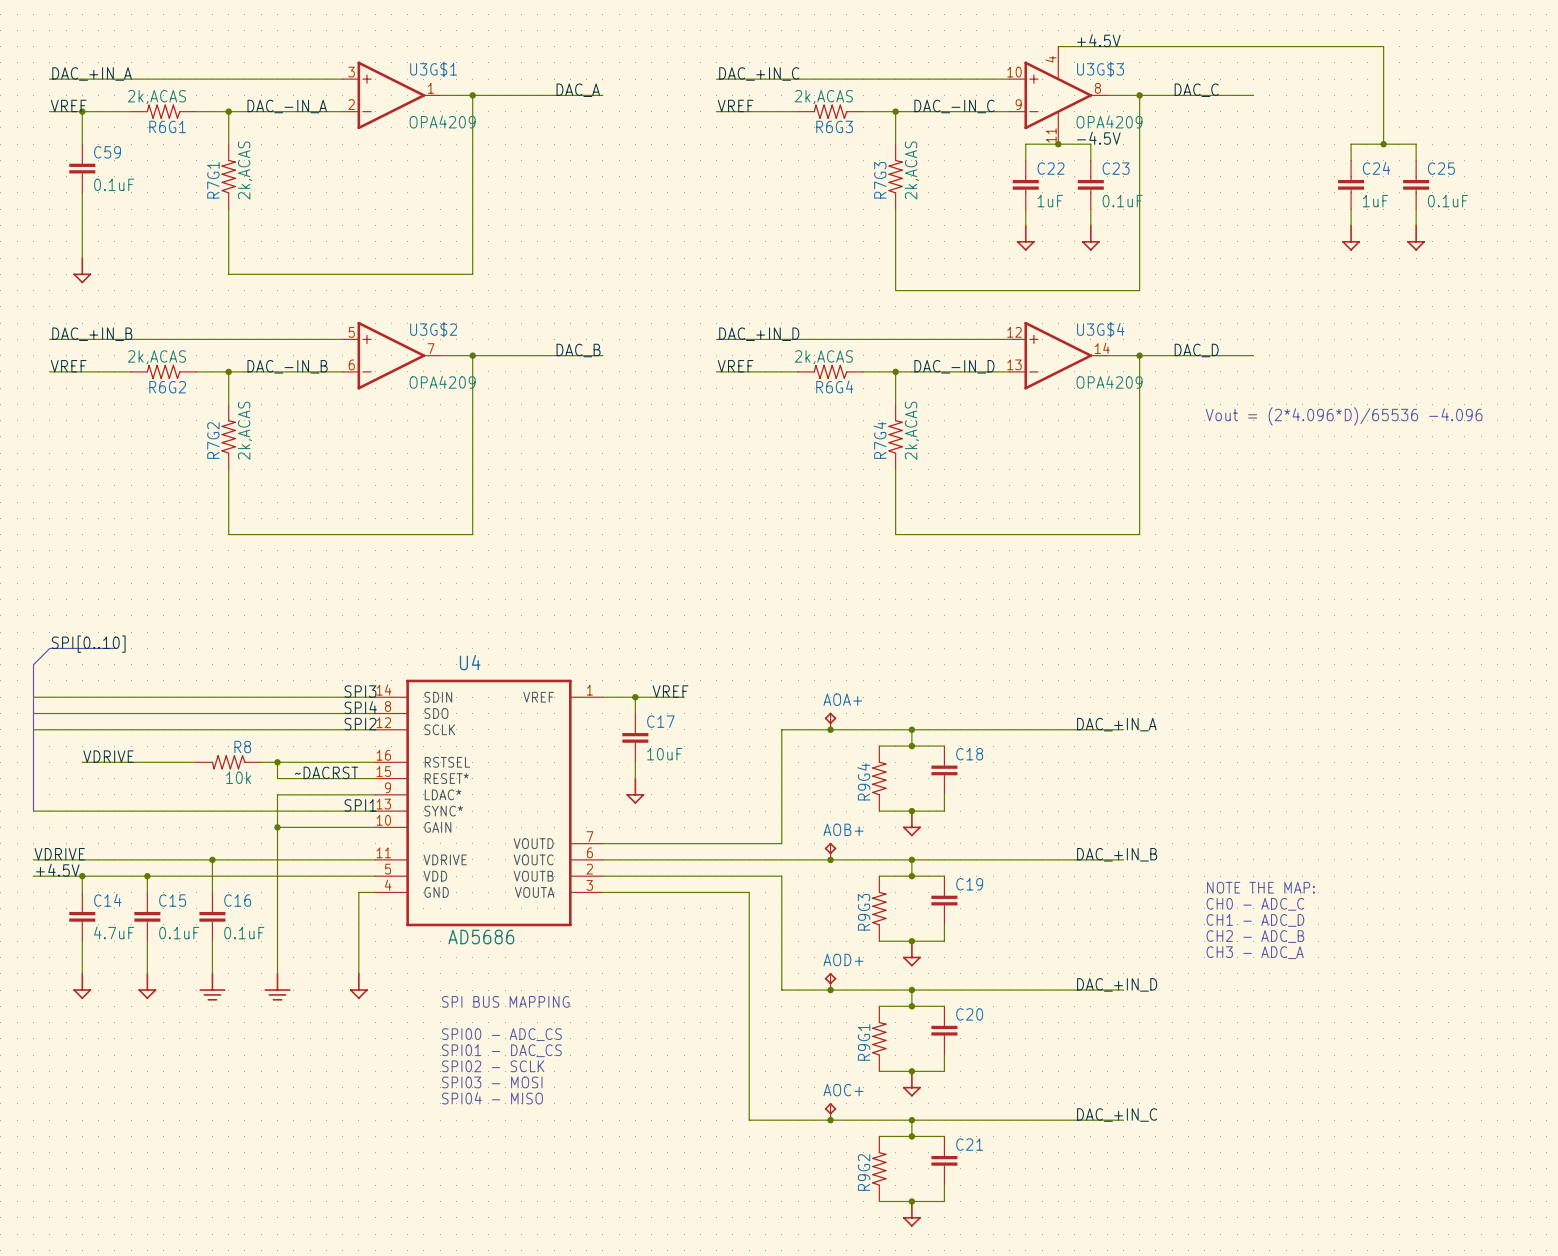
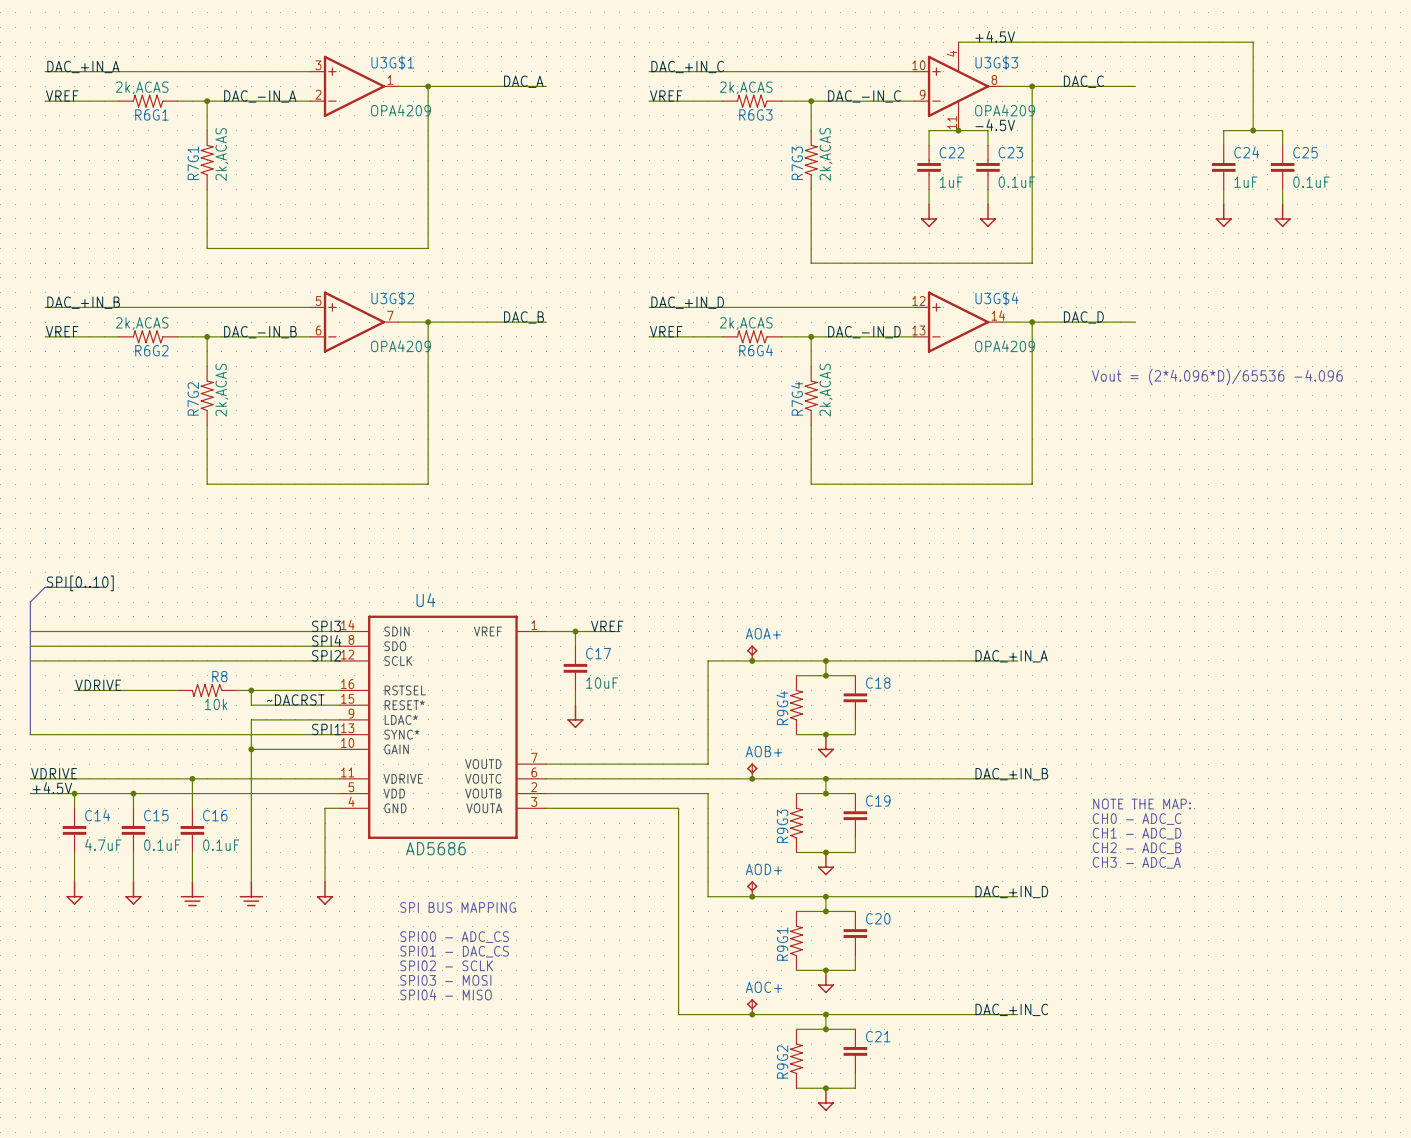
wire: (82, 111) (82, 144) -> none
junction: (82, 111) -> none
C59: 0.1uF (82, 168) -> none
wire: (82, 192) (82, 258) -> none
part: (82, 270) -> none

